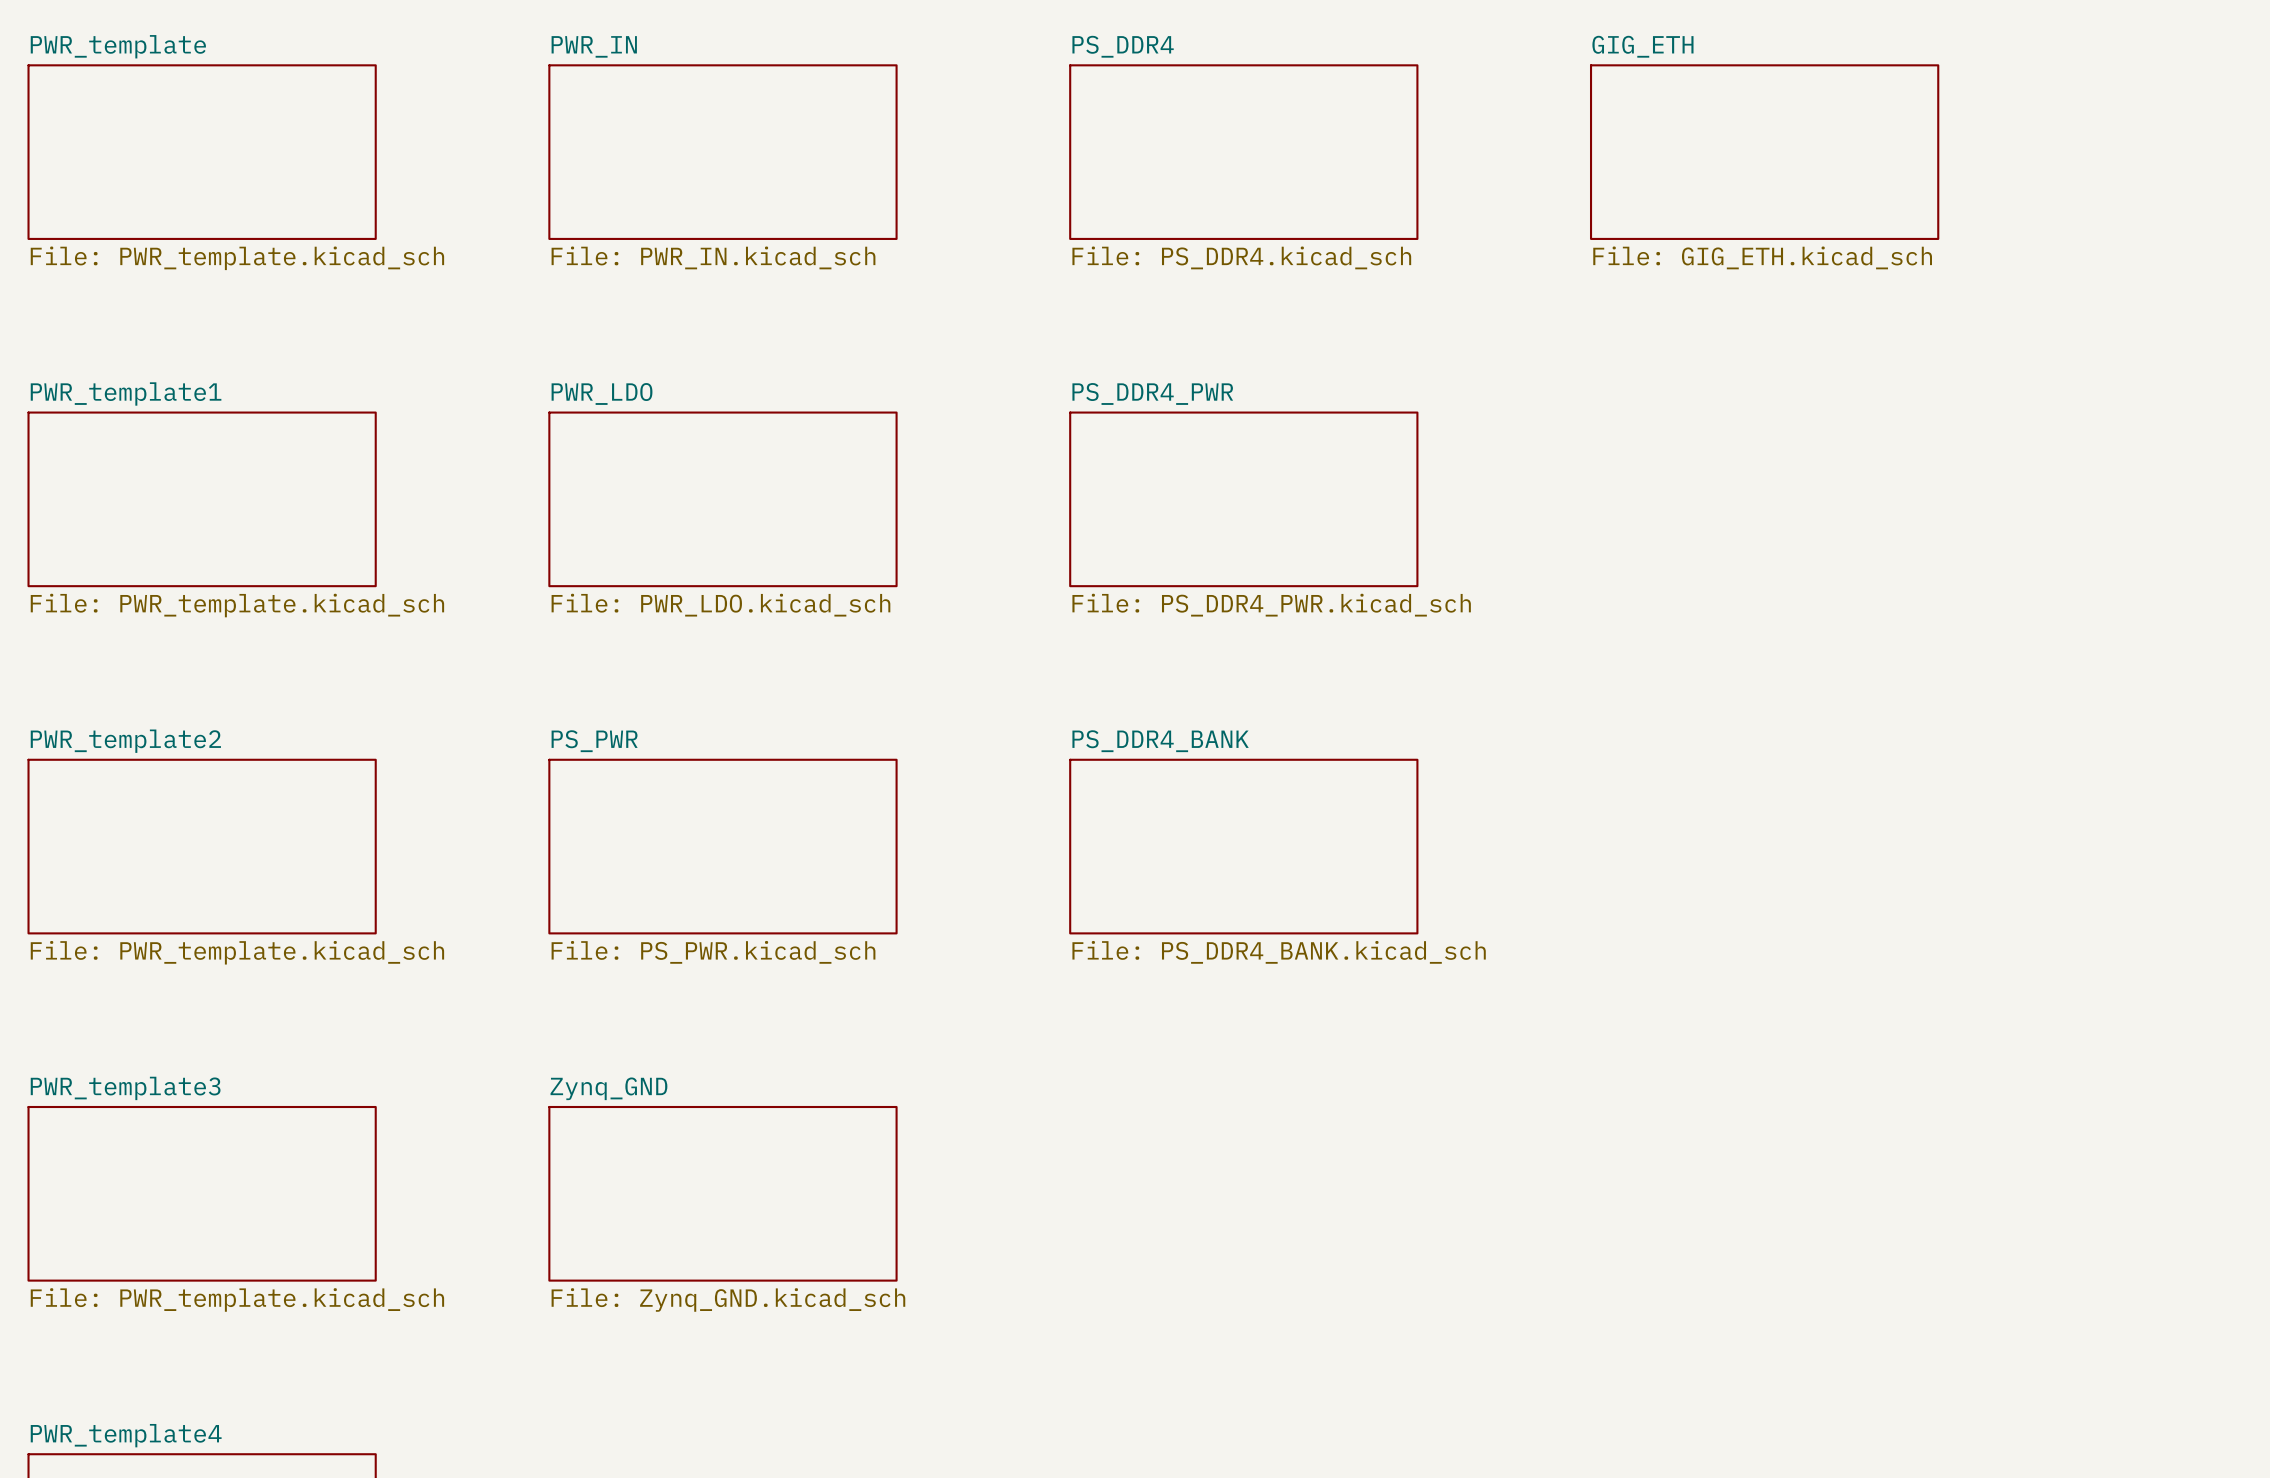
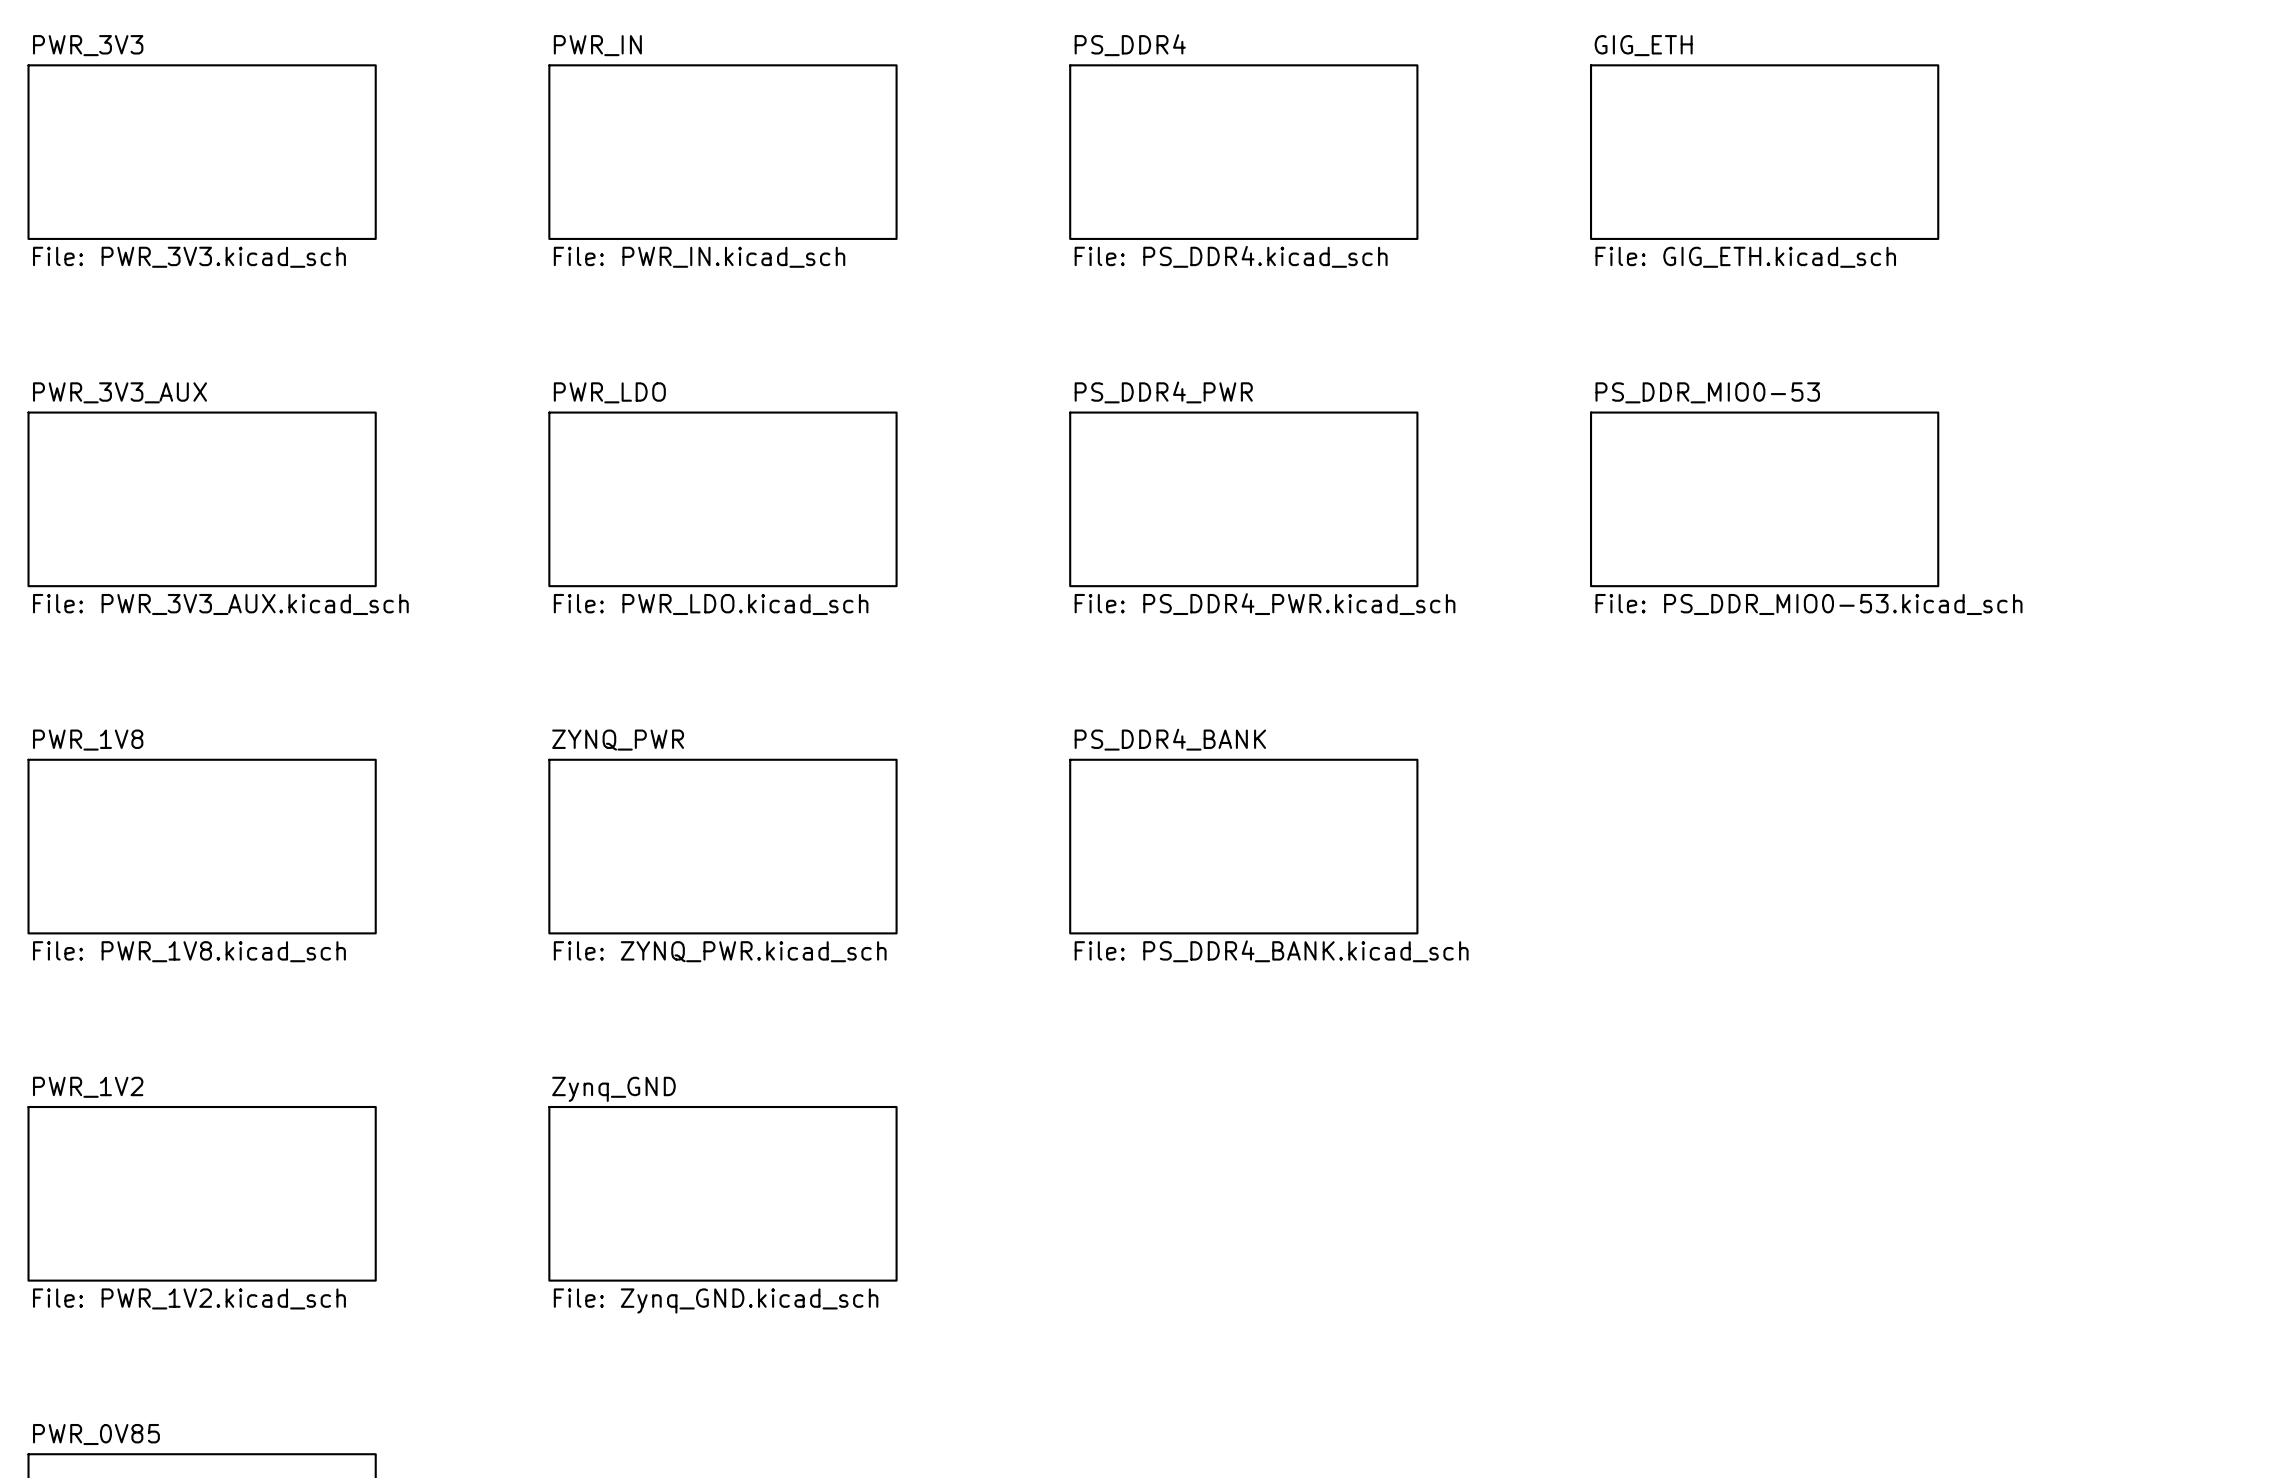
sheet PWR_template name: PWR_template (118, 46) -> PWR_3V3 (88, 45)
sheet PWR_template value: File: PWR_template.kicad_sch (237, 258) -> File: PWR_3V3.kicad_sch (189, 257)
sheet PWR_template1 name: PWR_template1 (126, 393) -> PWR_3V3_AUX (120, 392)
sheet PS_DDR_MIO0-53: none -> File: PS_DDR_MIO0-53.kicad_sch (1764, 499)
sheet PWR_template1 value: File: PWR_template.kicad_sch (237, 605) -> File: PWR_3V3_AUX.kicad_sch (220, 604)
sheet PWR_template2 name: PWR_template2 (125, 741) -> PWR_1V8 (88, 740)
sheet PS_PWR name: PS_PWR (594, 741) -> ZYNQ_PWR (618, 740)
sheet PWR_template2 value: File: PWR_template.kicad_sch (237, 952) -> File: PWR_1V8.kicad_sch (189, 951)
sheet PS_PWR value: File: PS_PWR.kicad_sch (713, 952) -> File: ZYNQ_PWR.kicad_sch (720, 951)
sheet PWR_template3 name: PWR_template3 (125, 1088) -> PWR_1V2 (88, 1087)
sheet PWR_template3 value: File: PWR_template.kicad_sch (237, 1299) -> File: PWR_1V2.kicad_sch (189, 1298)
sheet PWR_template4 name: PWR_template4 (126, 1435) -> PWR_0V85 (96, 1434)

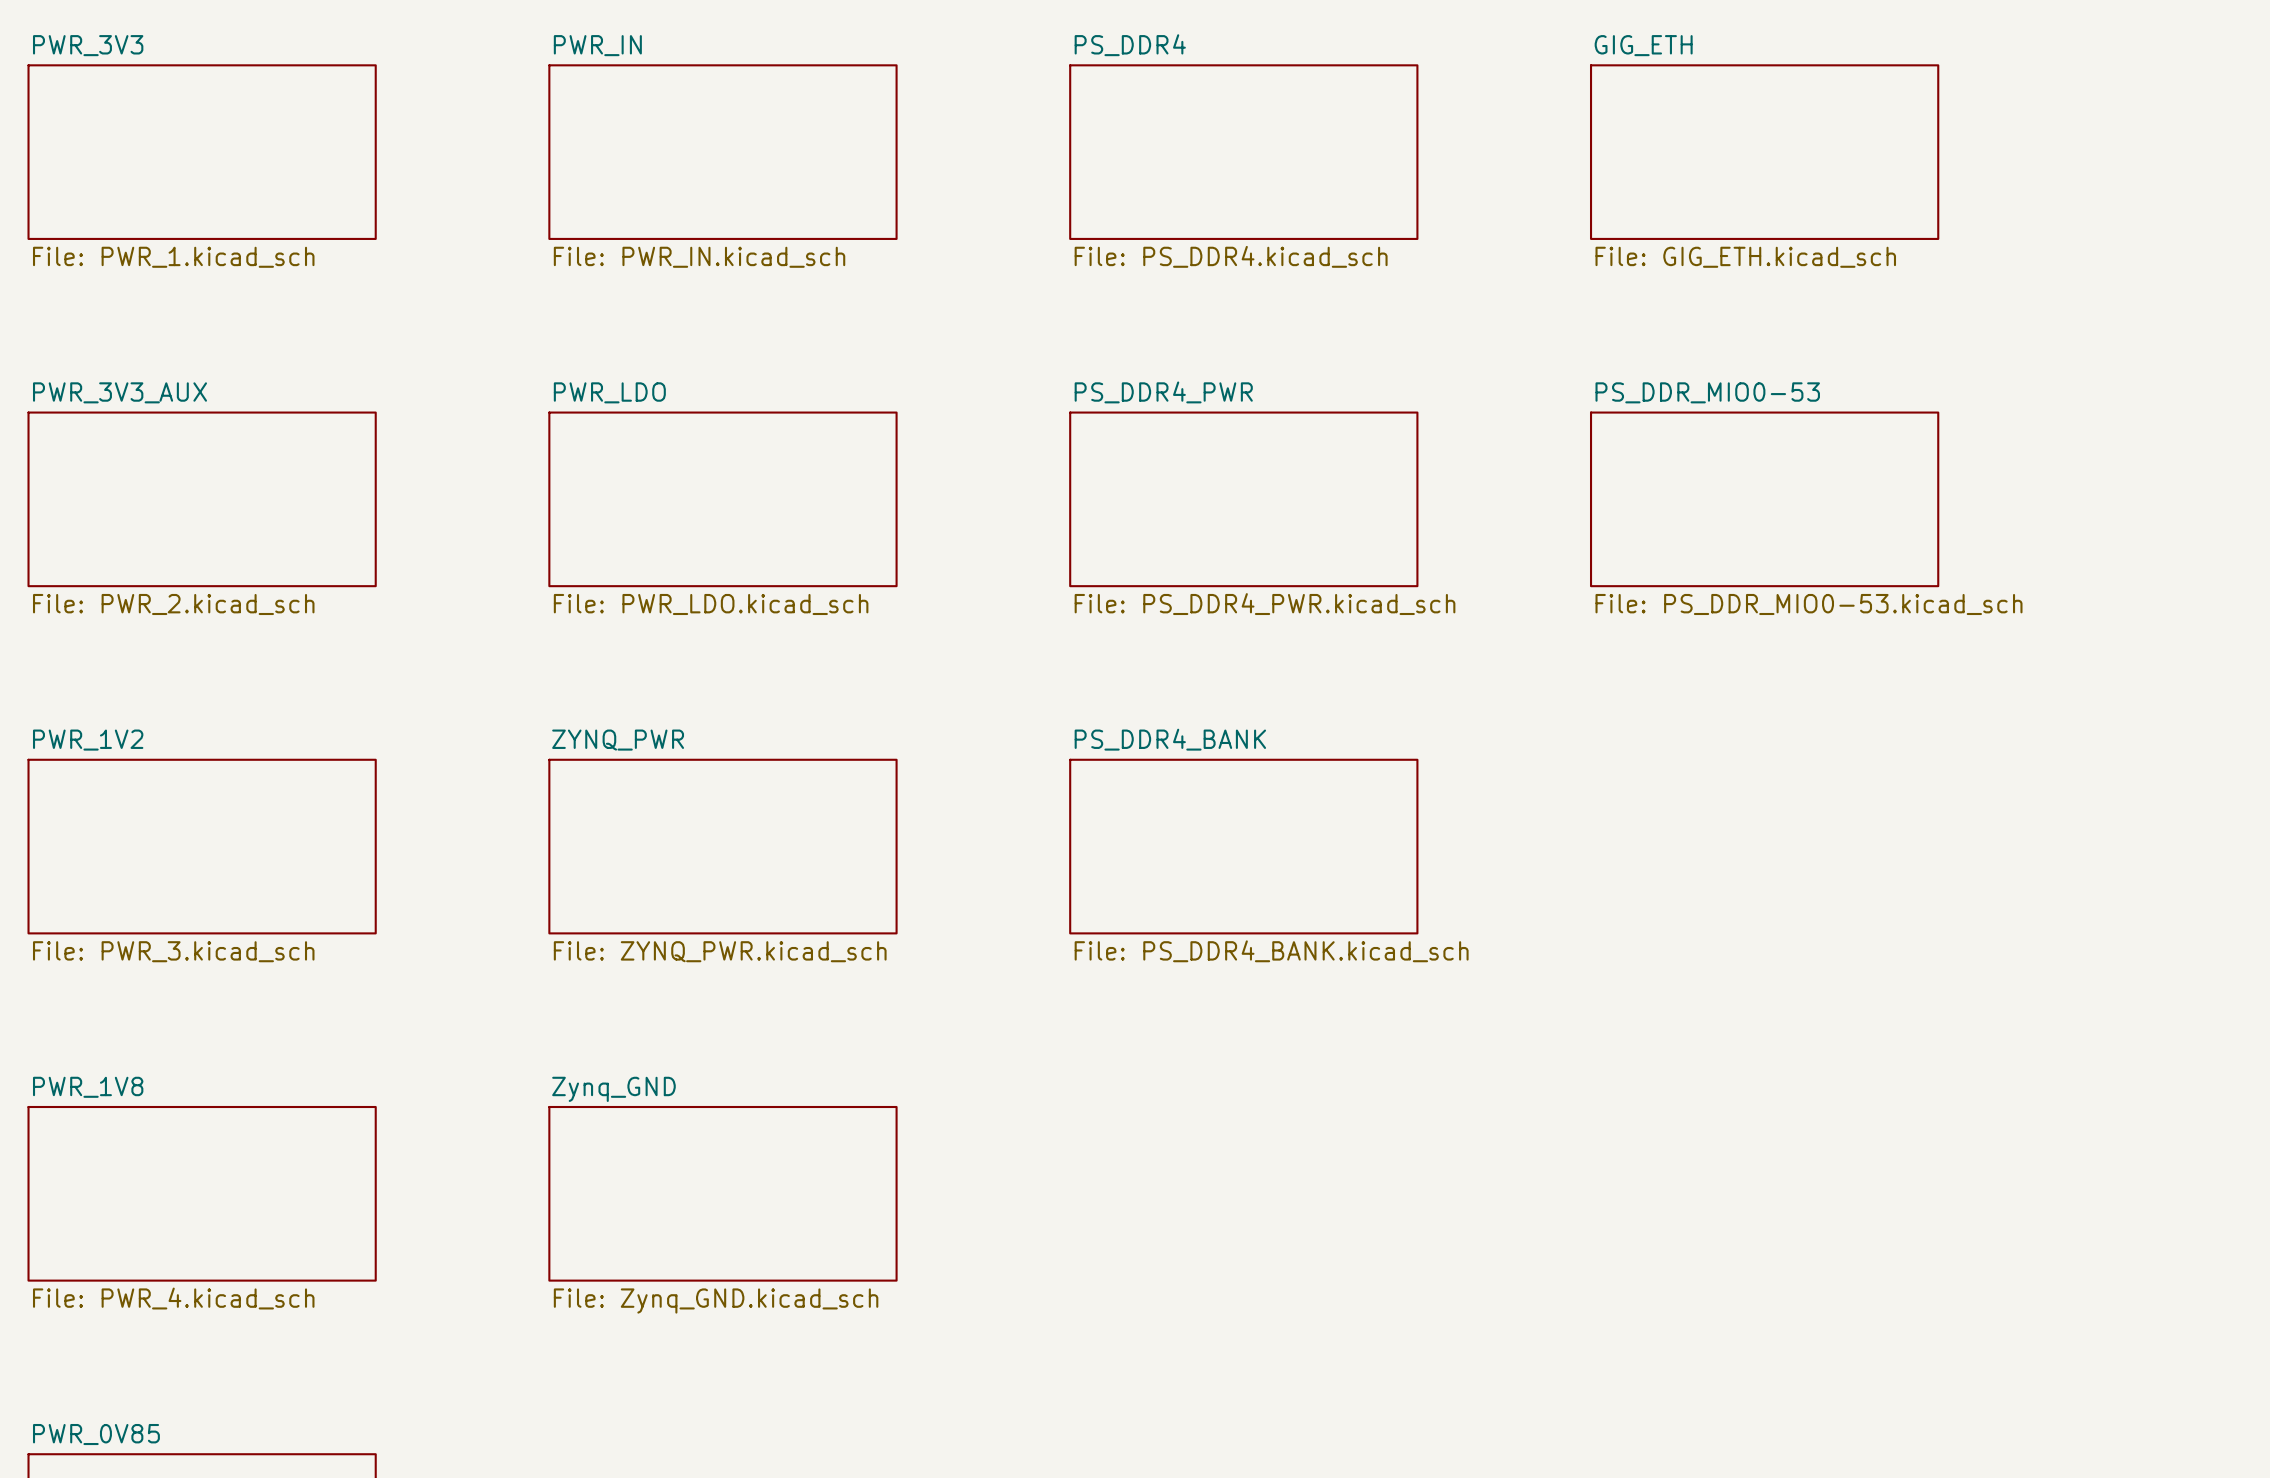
sheet PWR_3V3 value: File: PWR_3V3.kicad_sch (189, 257) -> File: PWR_1.kicad_sch (173, 257)
sheet PWR_3V3_AUX value: File: PWR_3V3_AUX.kicad_sch (220, 604) -> File: PWR_2.kicad_sch (173, 604)
sheet PWR_1V8 name: PWR_1V8 (88, 740) -> PWR_1V2 (88, 740)
sheet PWR_1V8 value: File: PWR_1V8.kicad_sch (189, 951) -> File: PWR_3.kicad_sch (173, 951)
sheet PWR_1V2 name: PWR_1V2 (88, 1087) -> PWR_1V8 (88, 1087)
sheet PWR_1V2 value: File: PWR_1V2.kicad_sch (189, 1298) -> File: PWR_4.kicad_sch (173, 1298)

